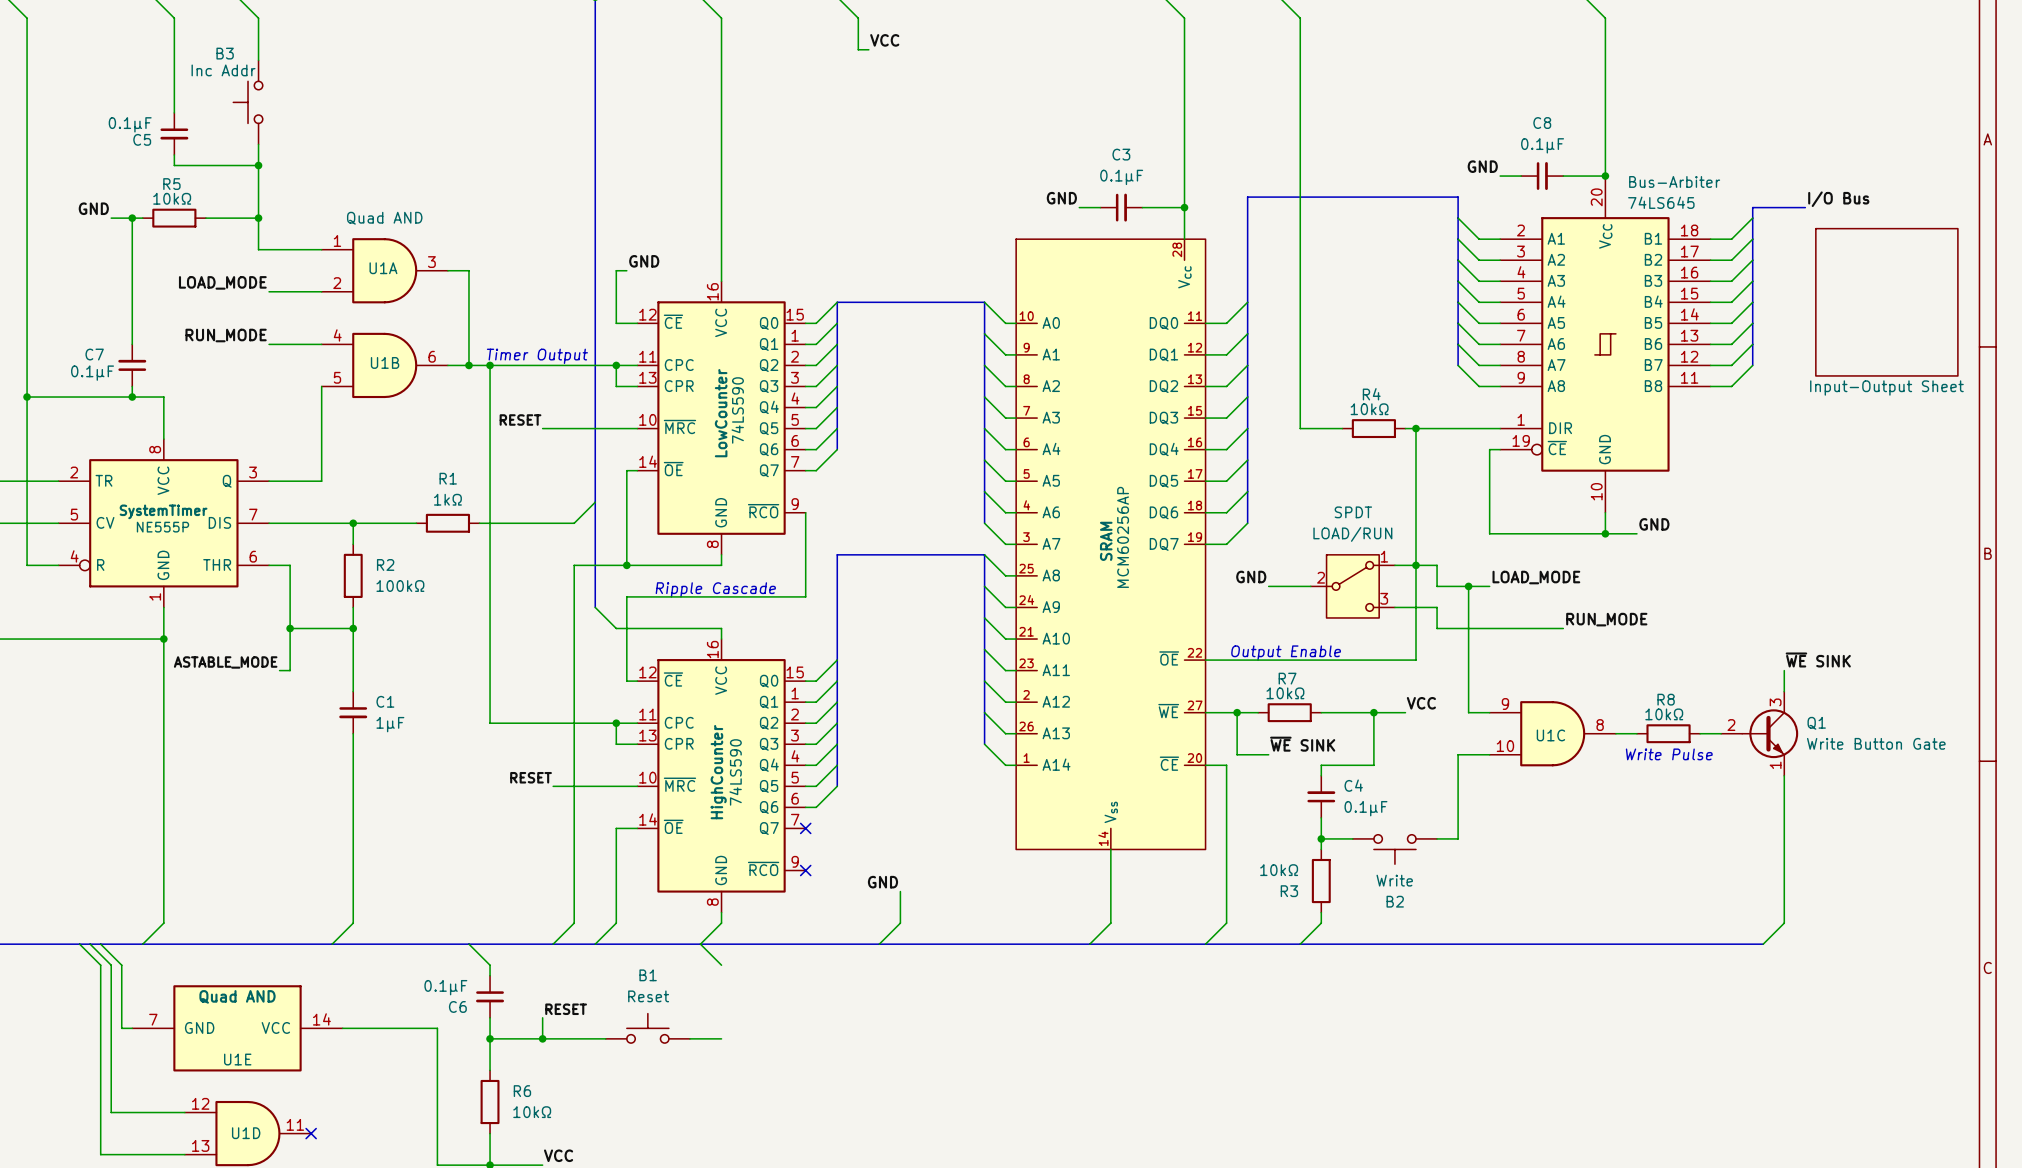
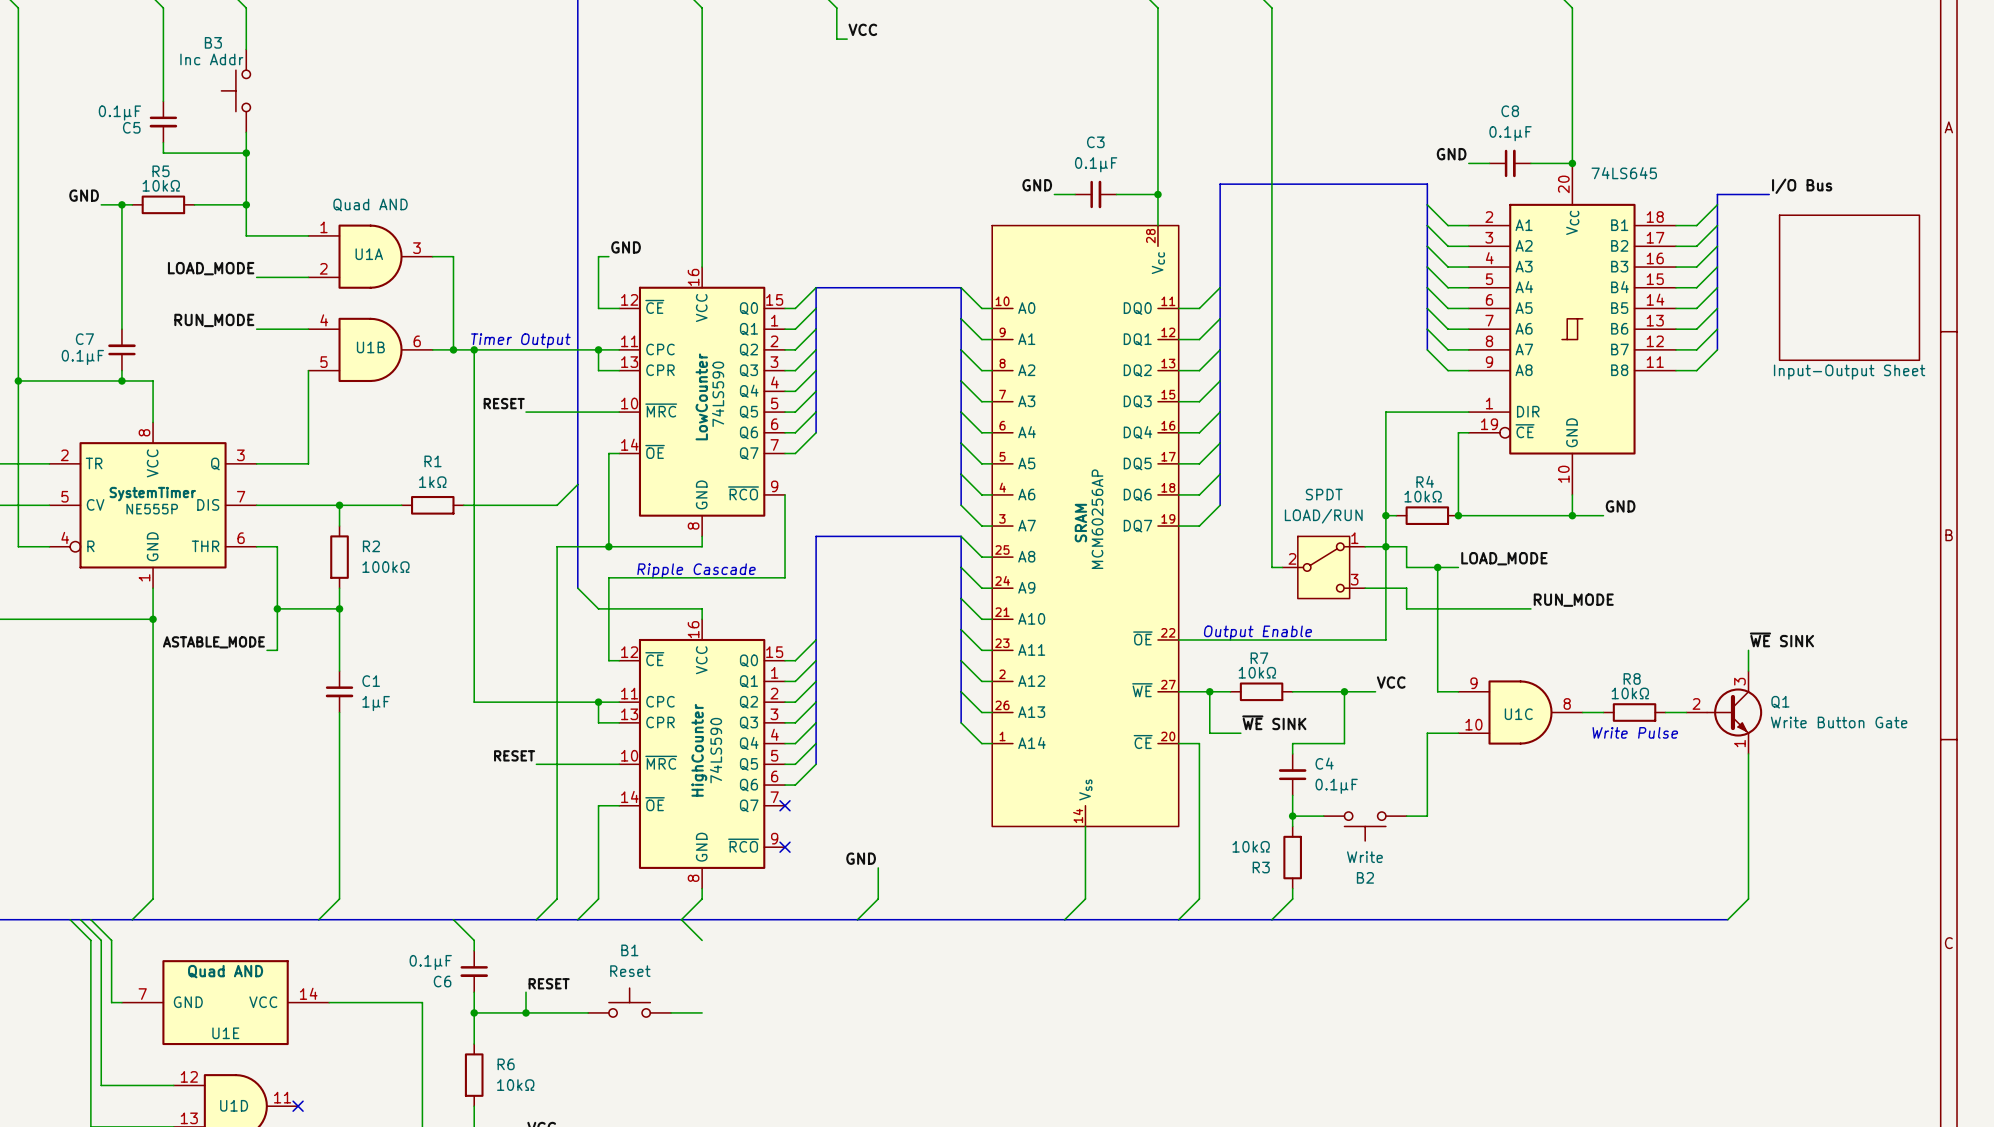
Bus-Arbiter name: Bus-Arbiter (1674, 181) -> 74LS645 (1624, 173)
Bus-Arbiter value: 74LS645 (1661, 202) -> none
wire: (1300, 428) (1342, 428) -> none
R4 position: (1373, 428) -> (1427, 515)
wire: (1405, 428) (1416, 428) -> (1385, 515) (1396, 515)
junction: (1416, 428) -> none
junction: none -> (1385, 515)
junction: none -> (1458, 515)
label: GND (1251, 577) -> none
wire: (1268, 586) (1300, 586) -> (1271, 412) (1271, 567)

